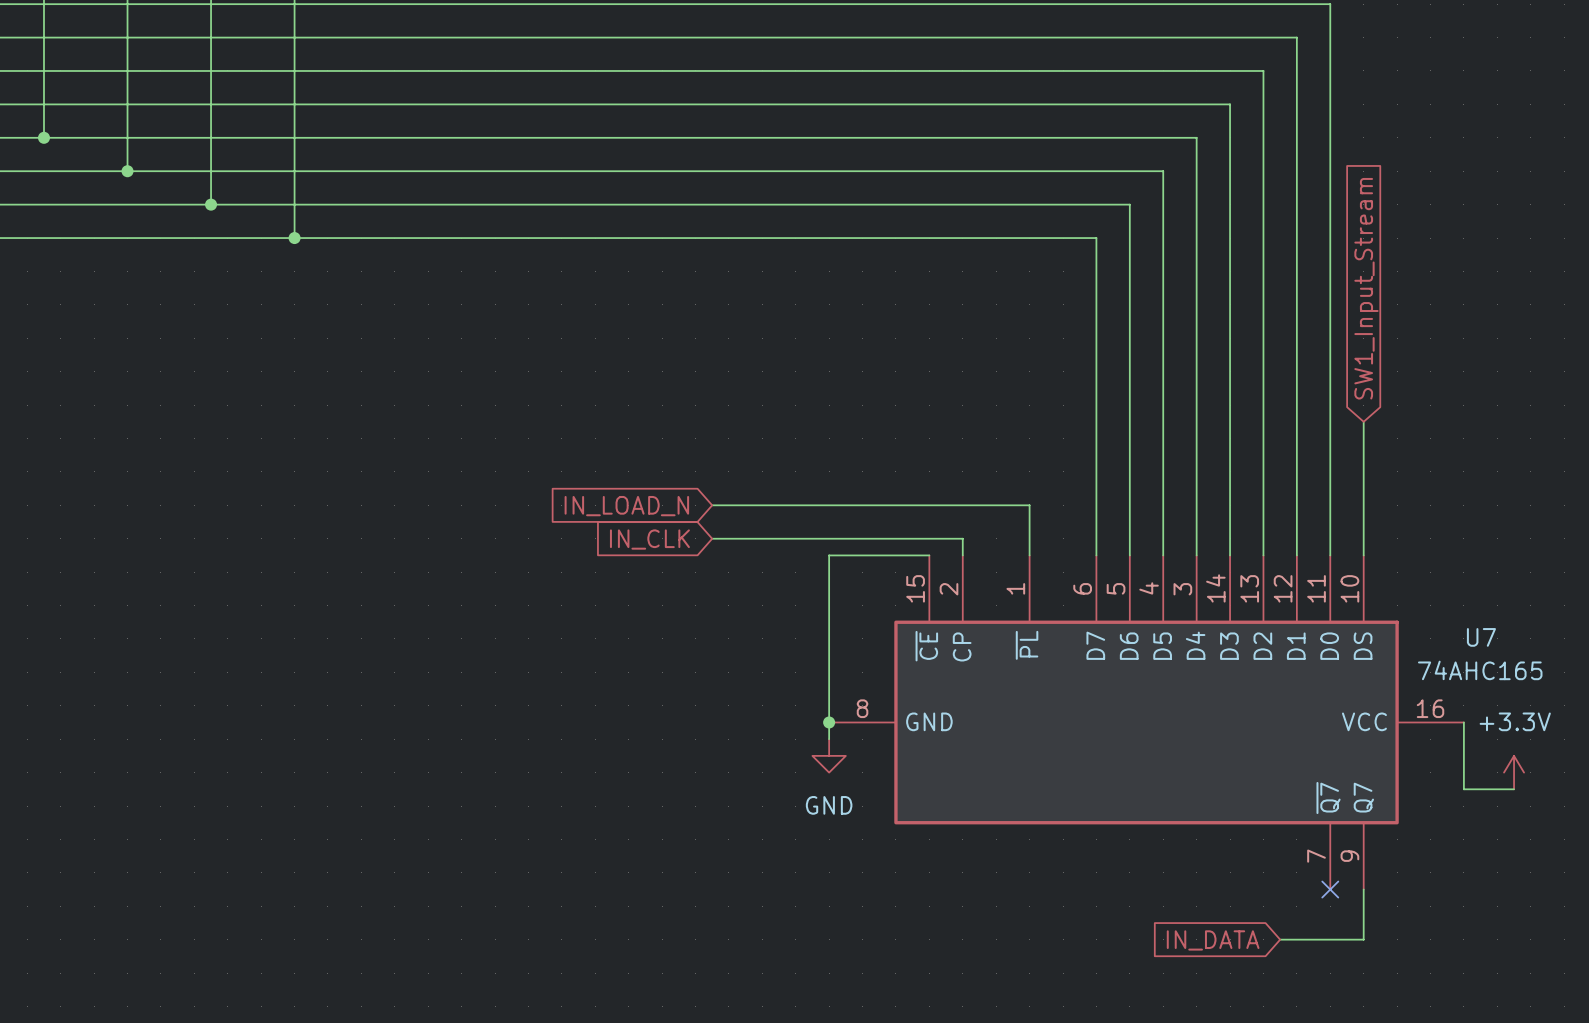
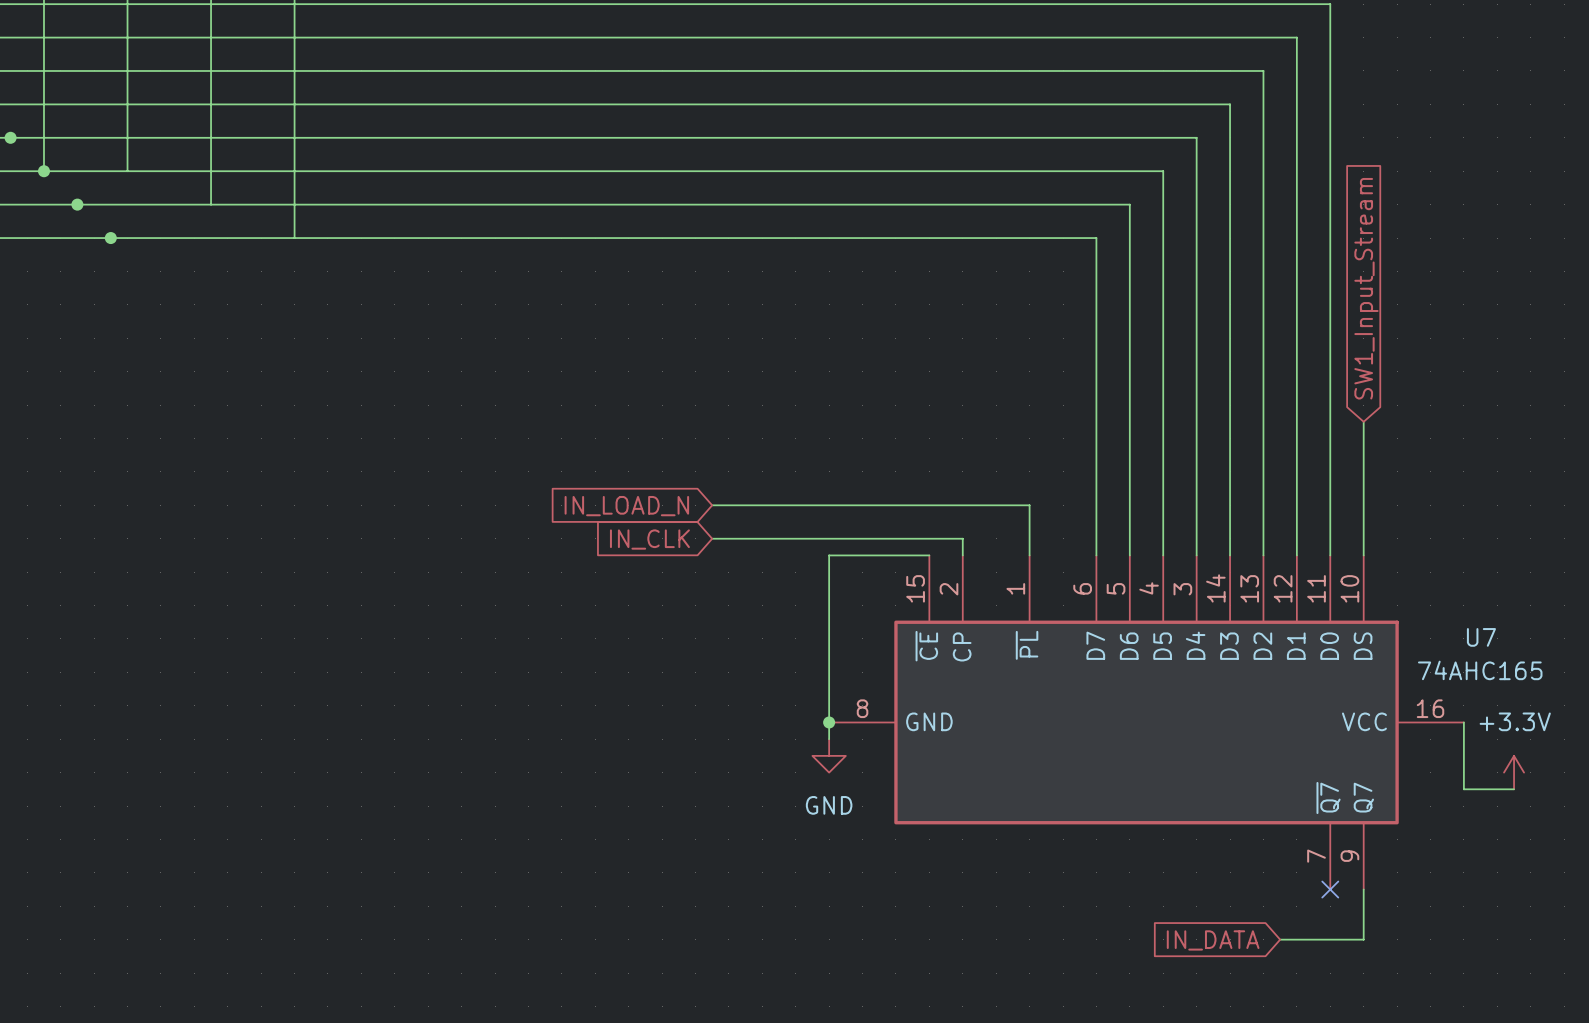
junction: none -> (10, 137)
wire: none -> (43, 137) (43, 171)
junction: (43, 137) -> none
junction: none -> (43, 171)
junction: (127, 171) -> none
junction: none -> (77, 204)
junction: (211, 204) -> none
junction: none -> (110, 238)
junction: (294, 238) -> none

